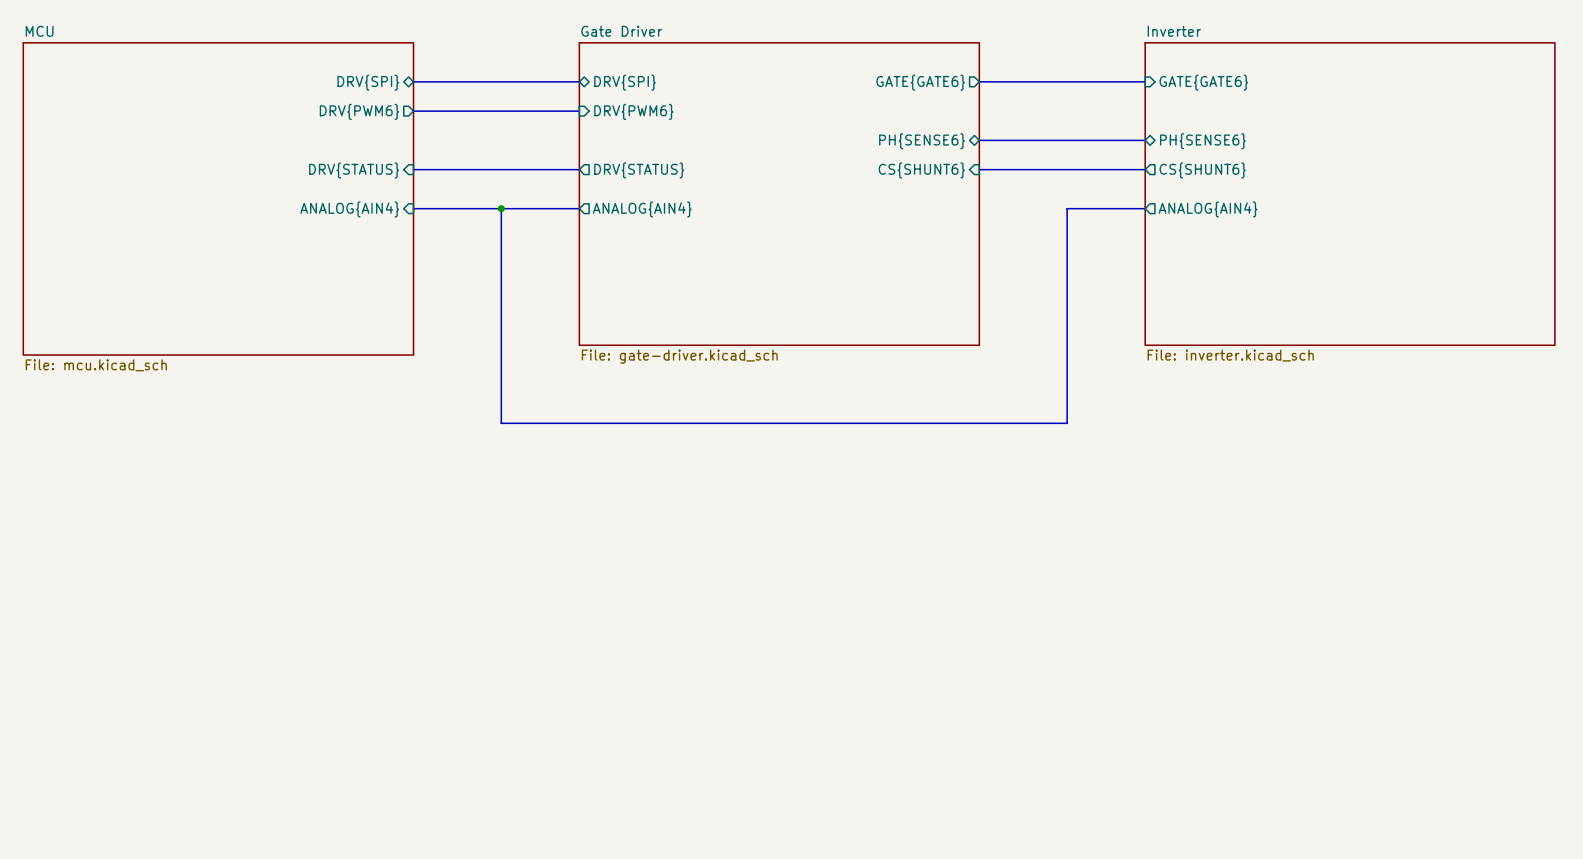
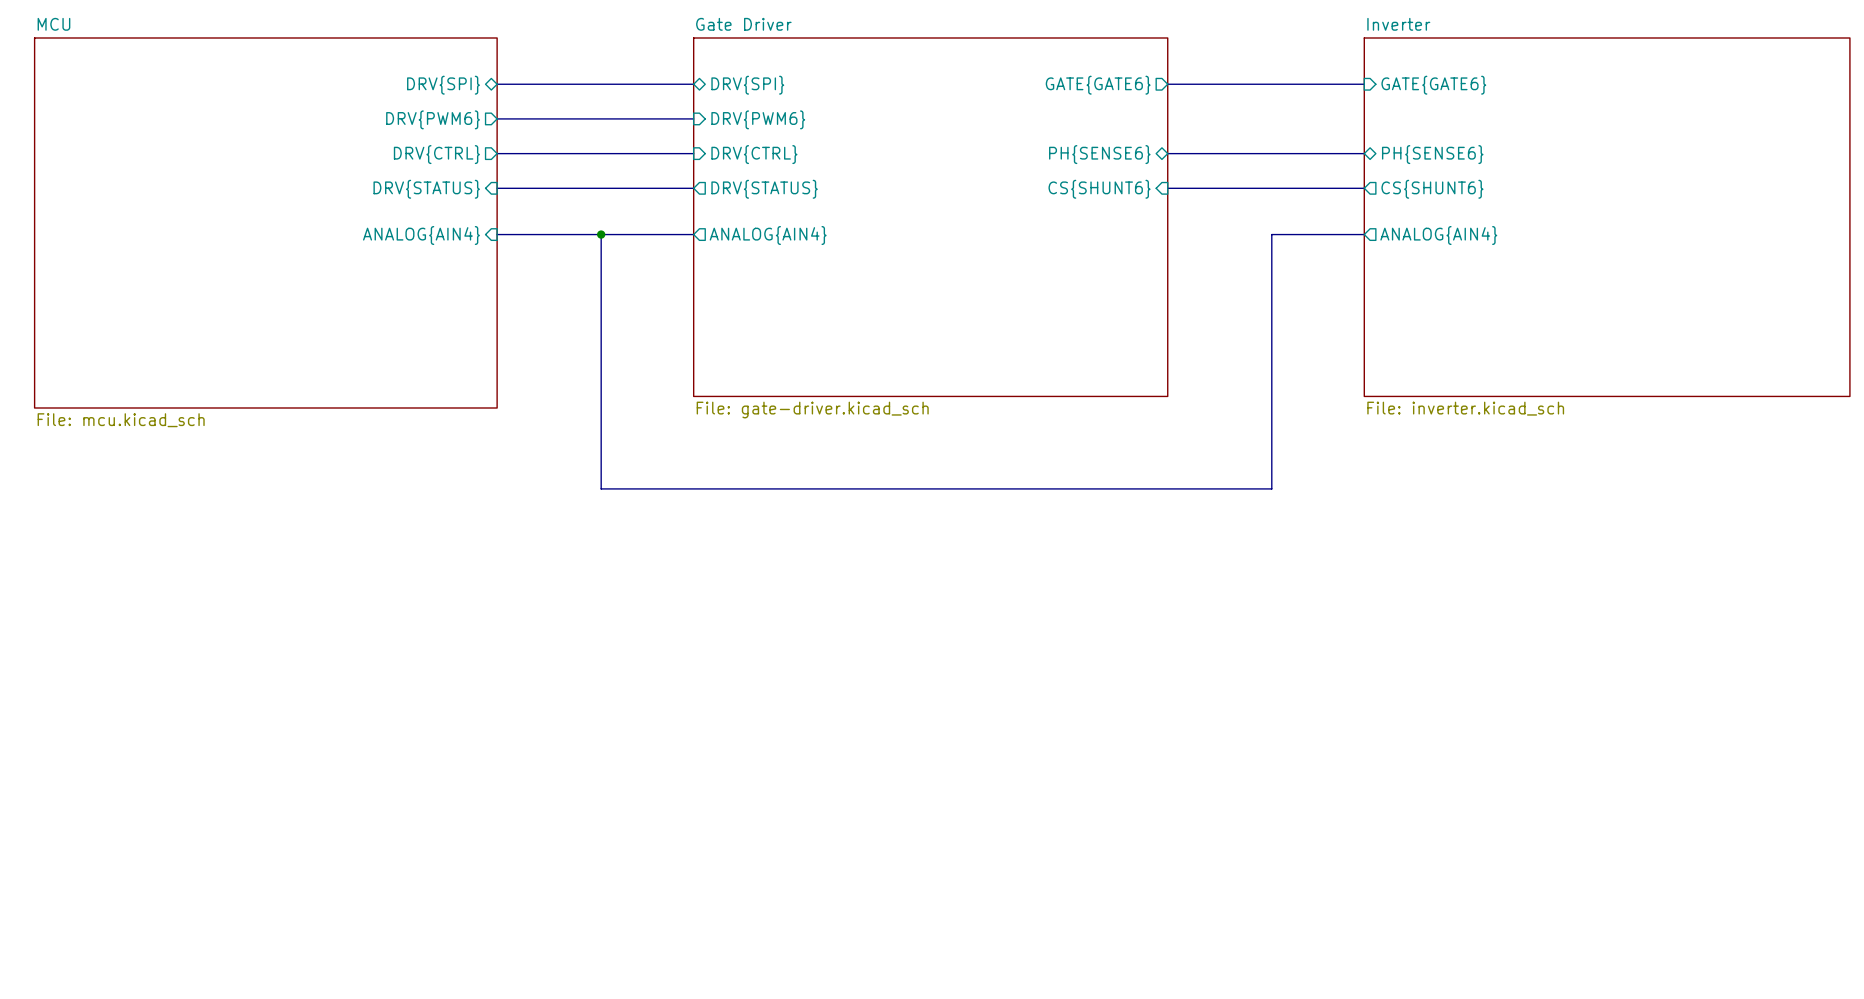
bus: none -> (497, 153) (693, 153)
sheet pin: none -> DRV{CTRL} (436, 154)
sheet pin: none -> DRV{CTRL} (754, 154)

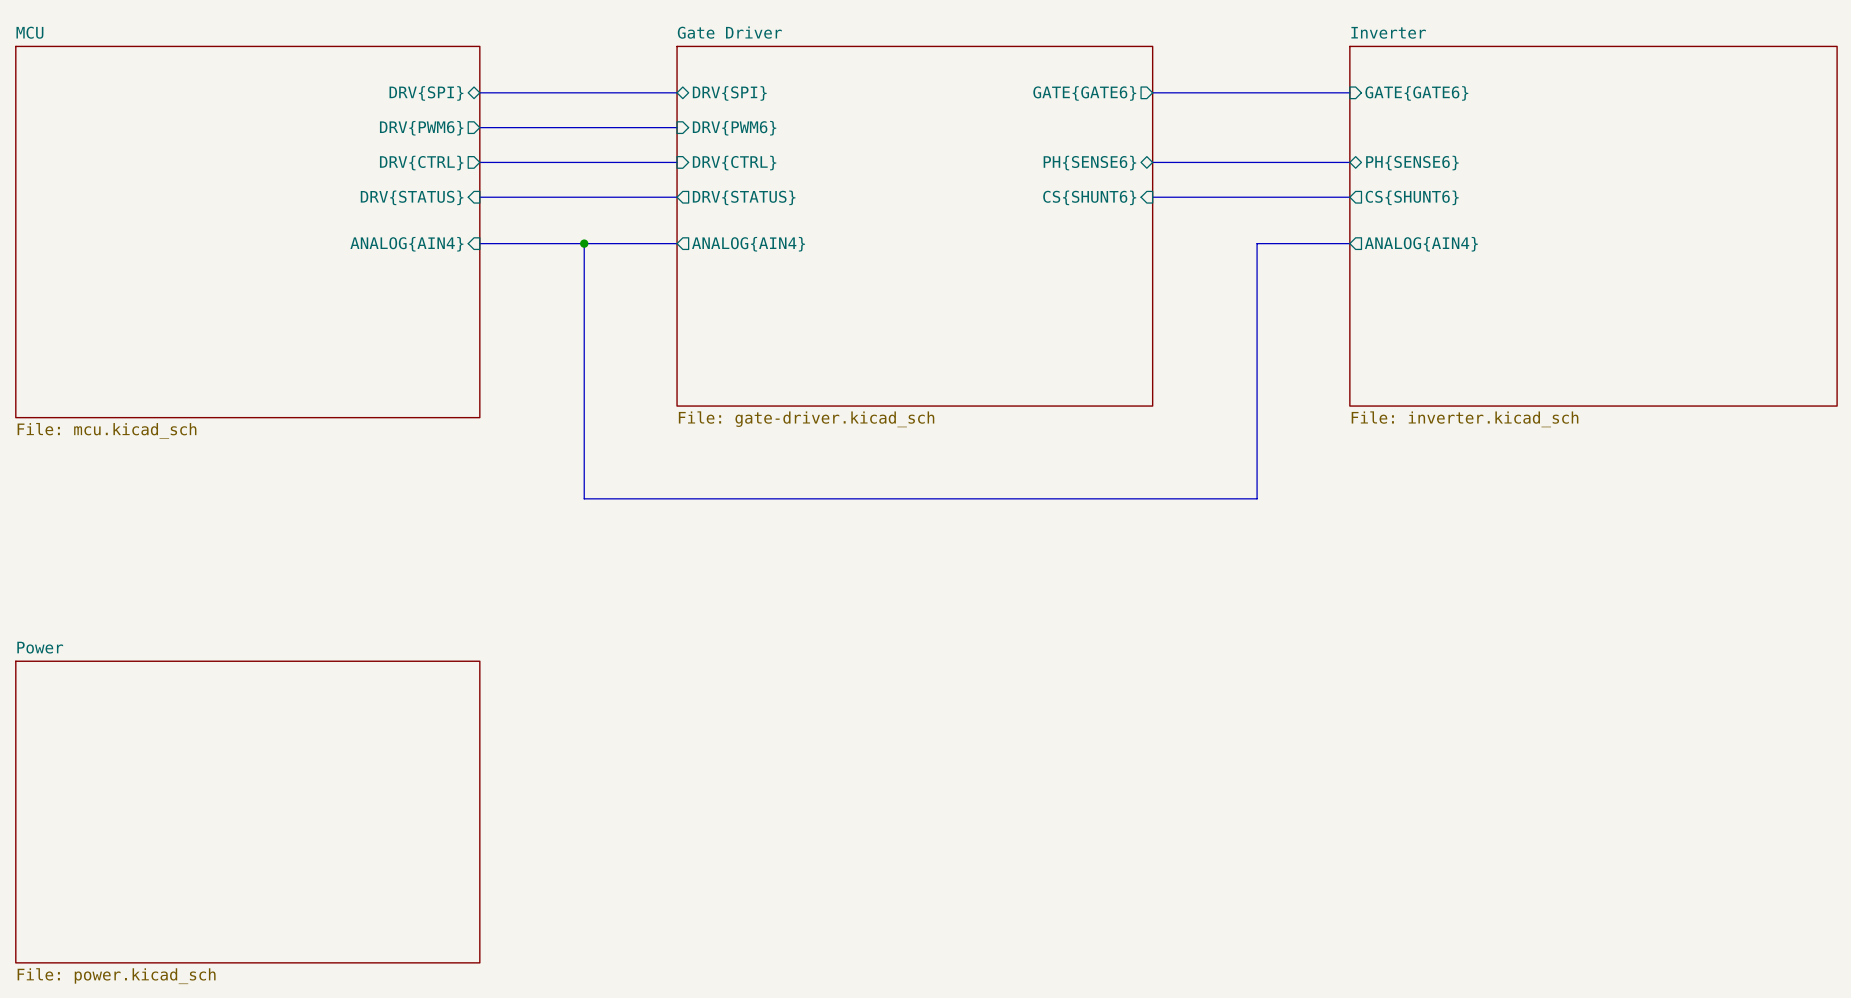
sheet Power: none -> File: power.kicad_sch (247, 812)

